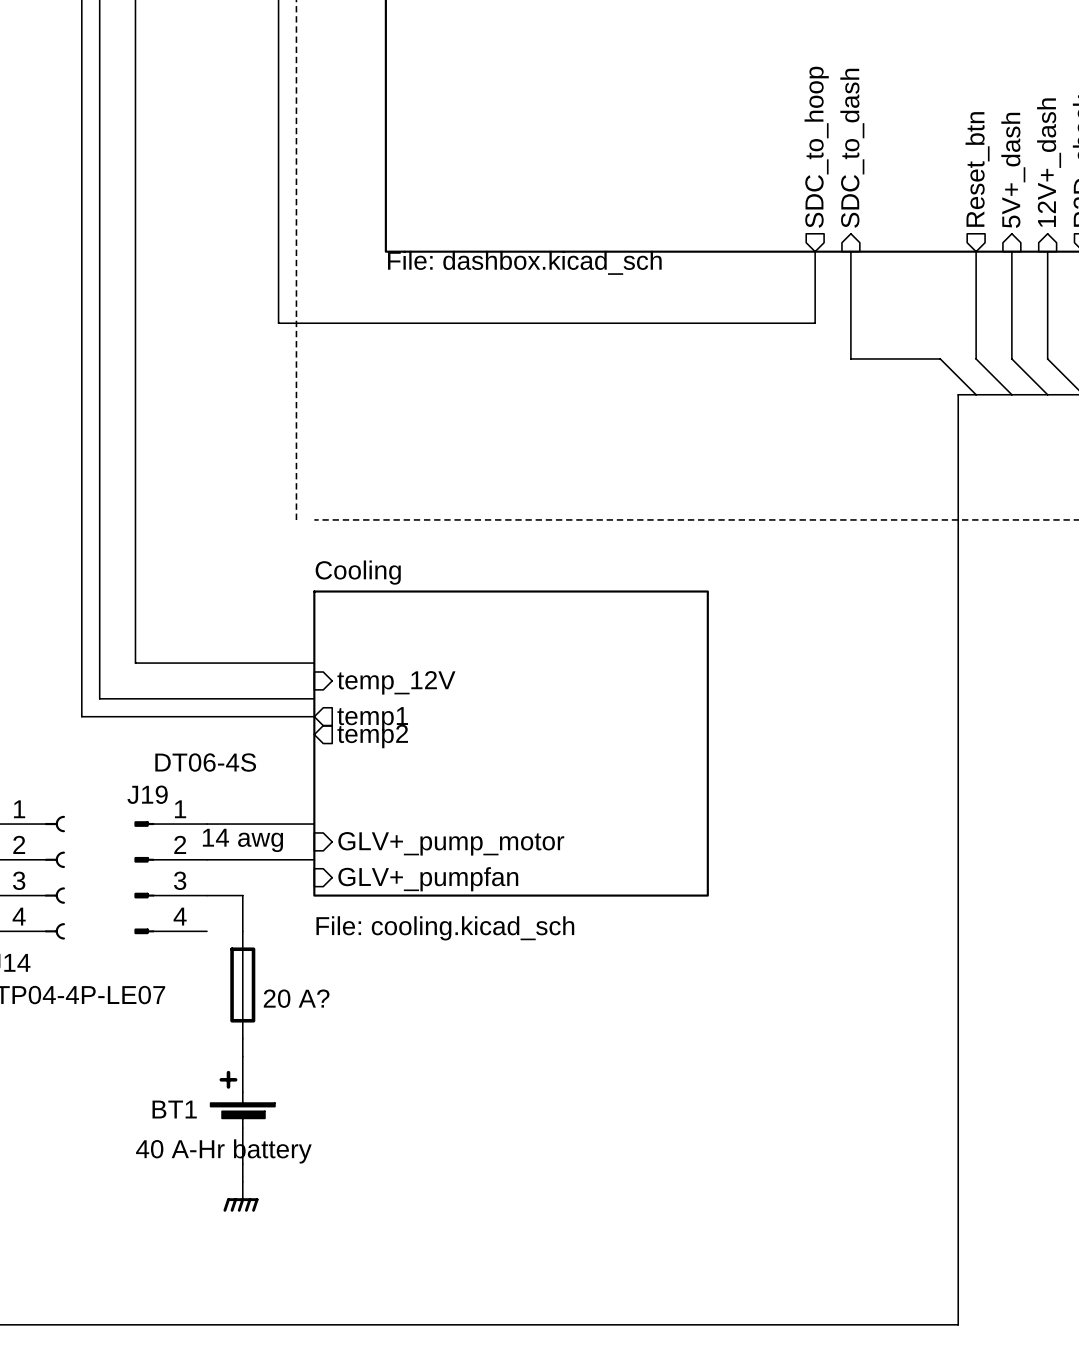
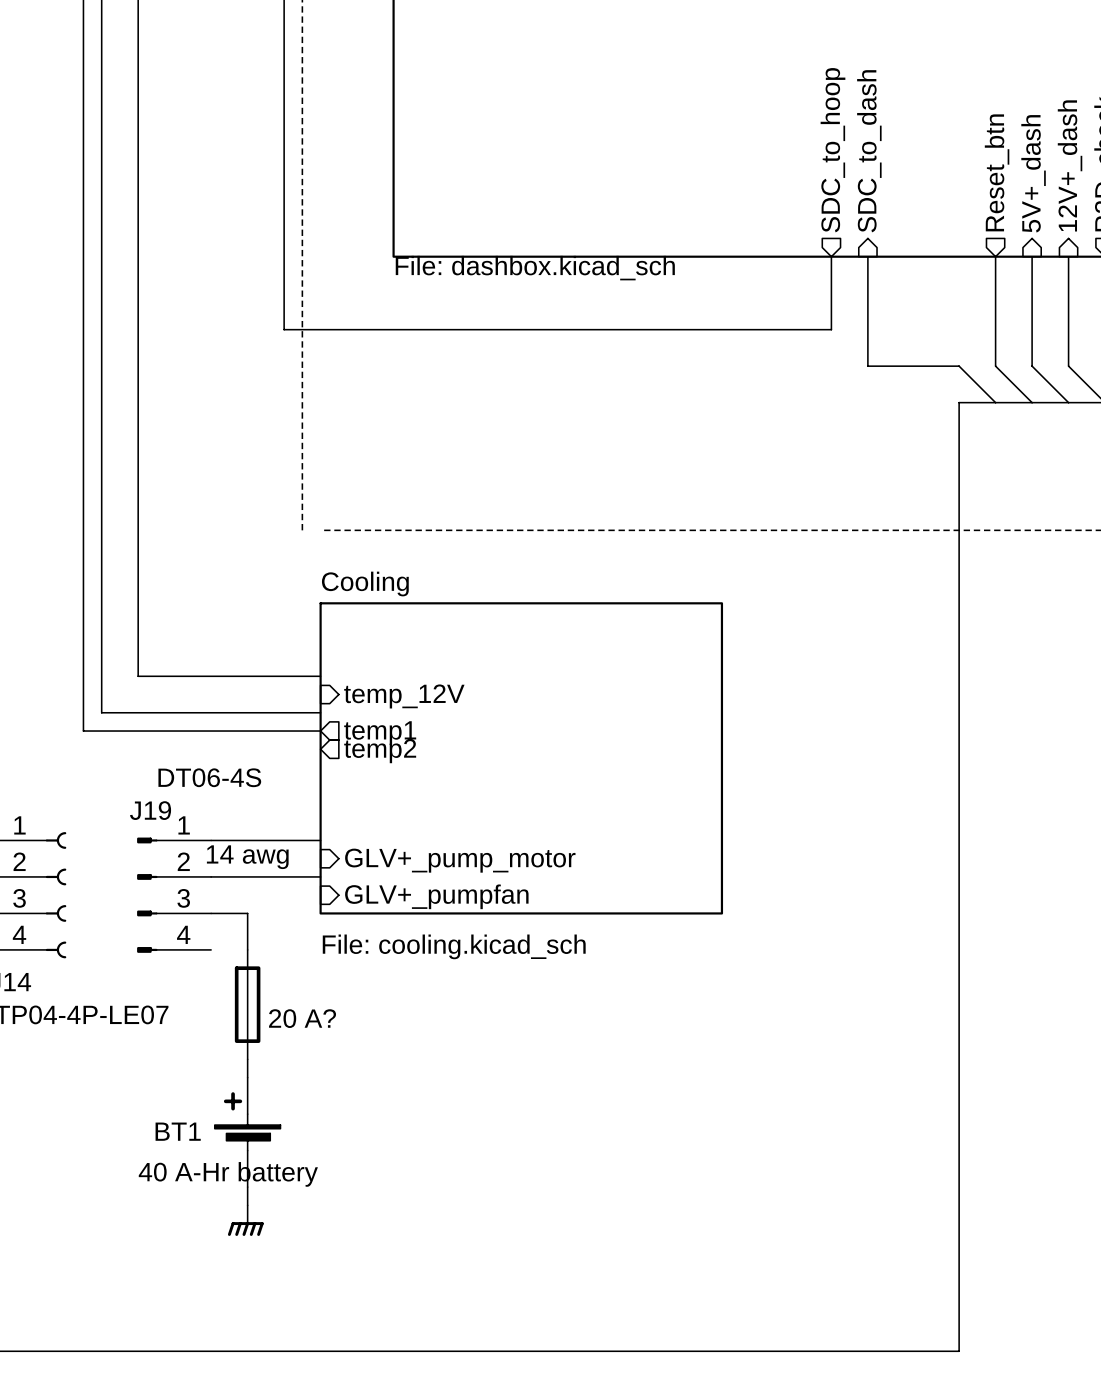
bus: (958, 394) (958, 1324) (940, 1324) -> (977, 402) (959, 402) (959, 1351)

